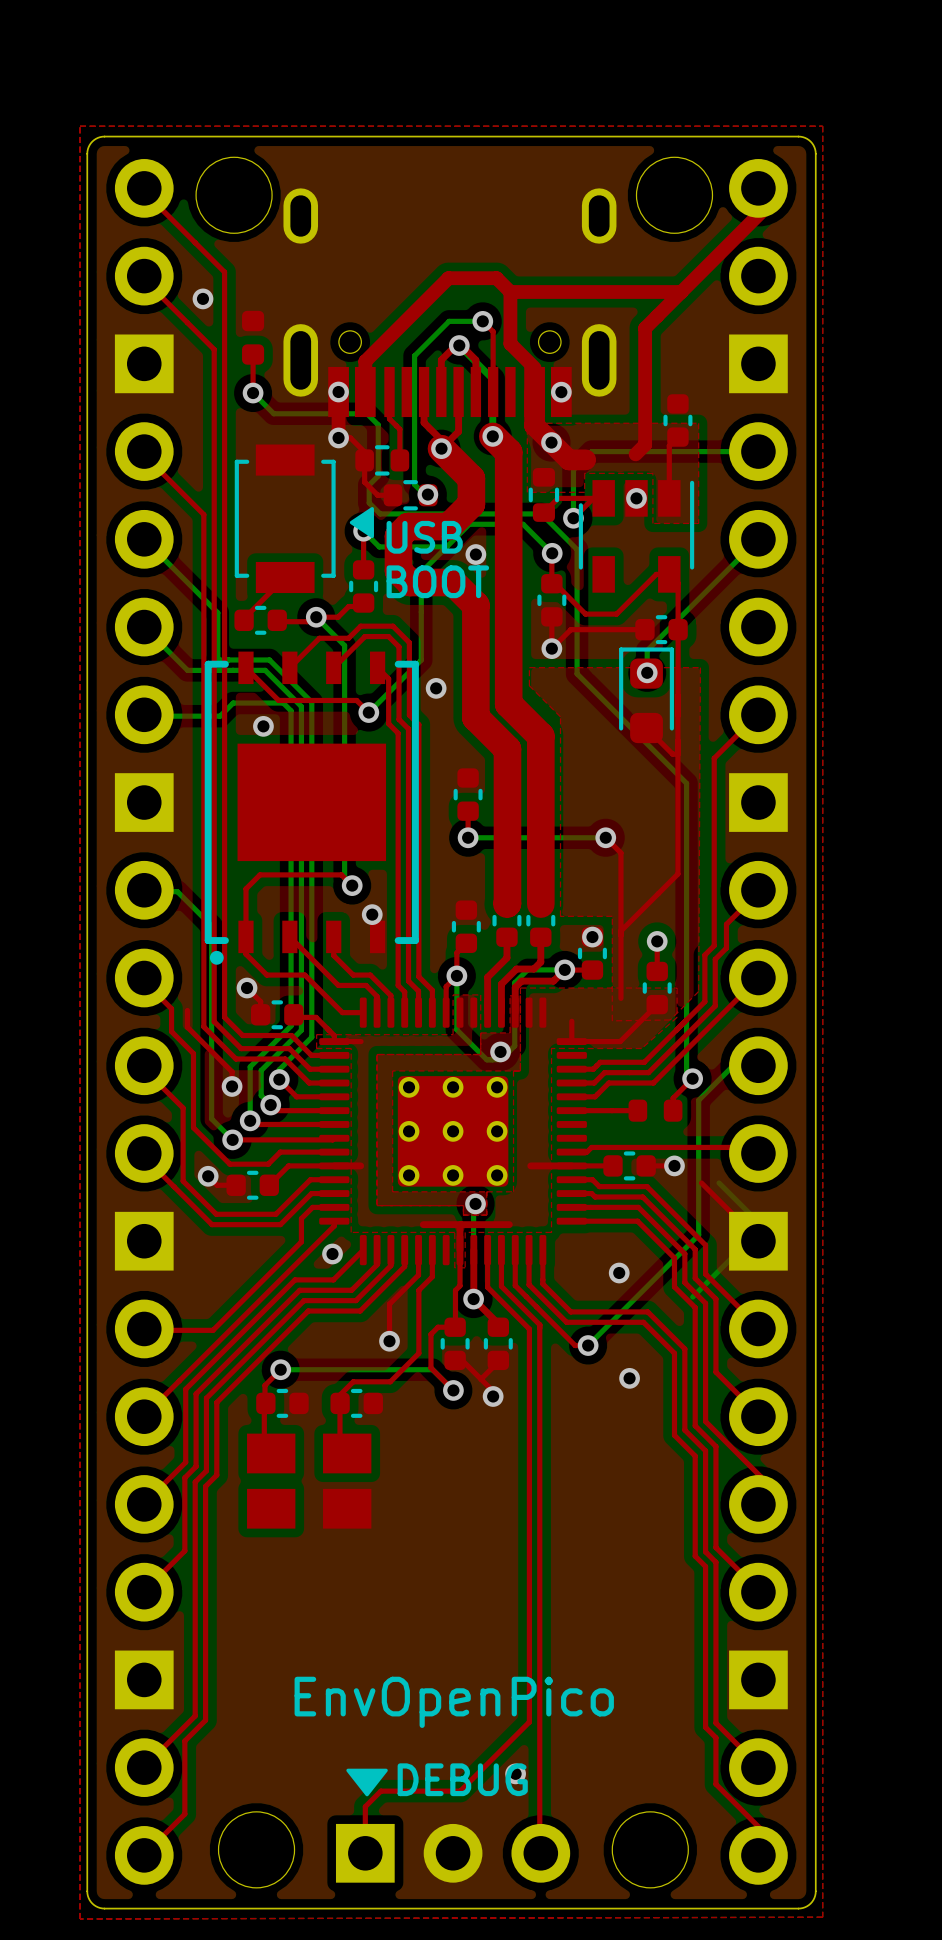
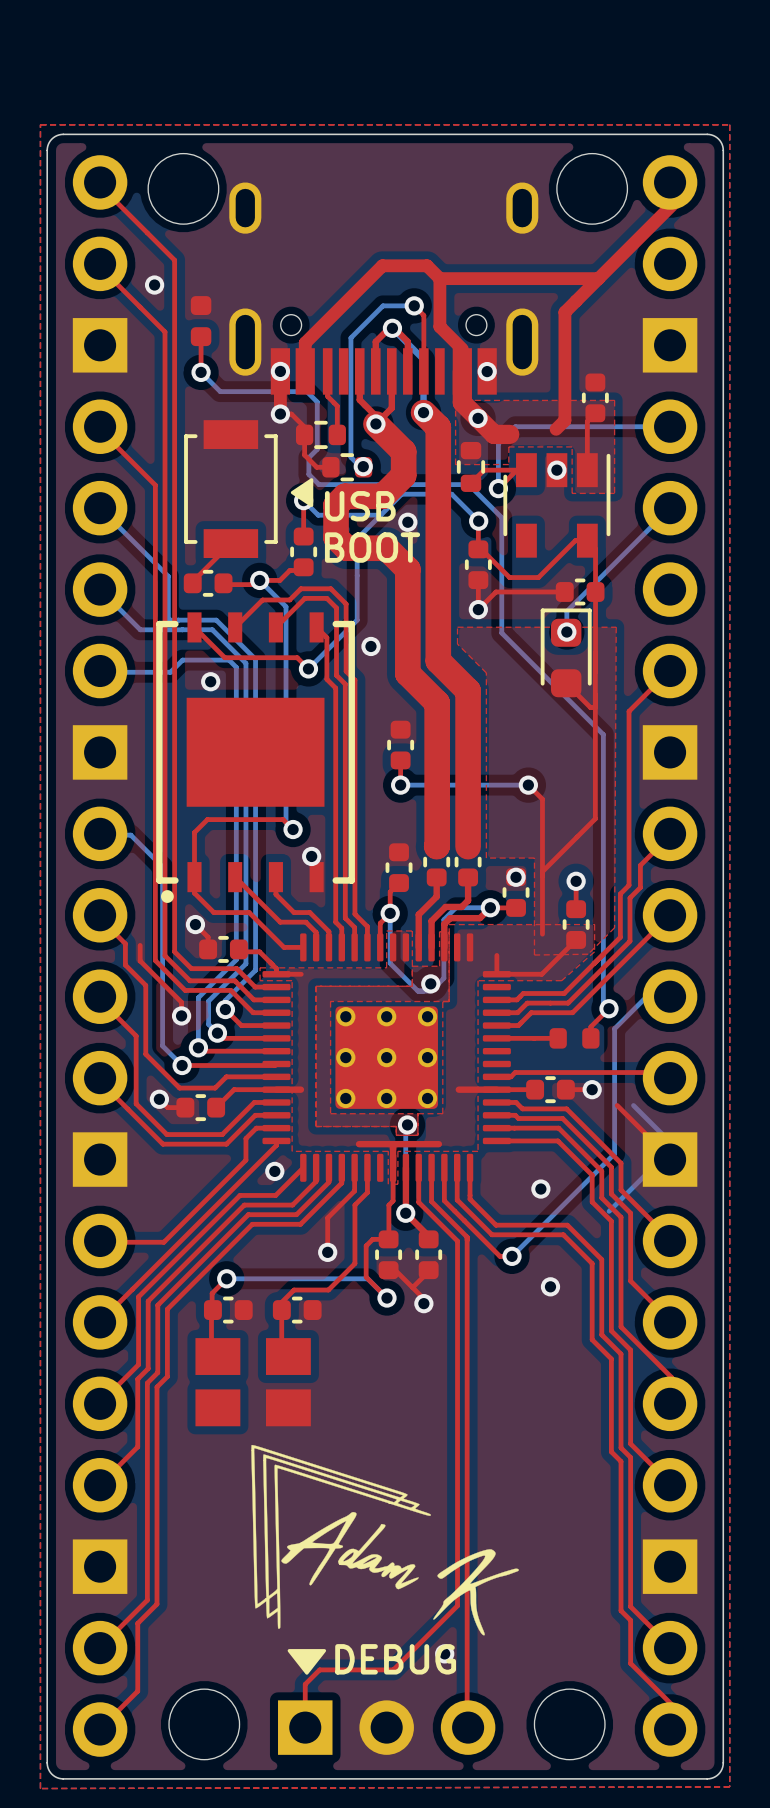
drawing: none -> [251, 1444, 519, 1636]
text: EnvOpenPico (454, 1702) -> none

